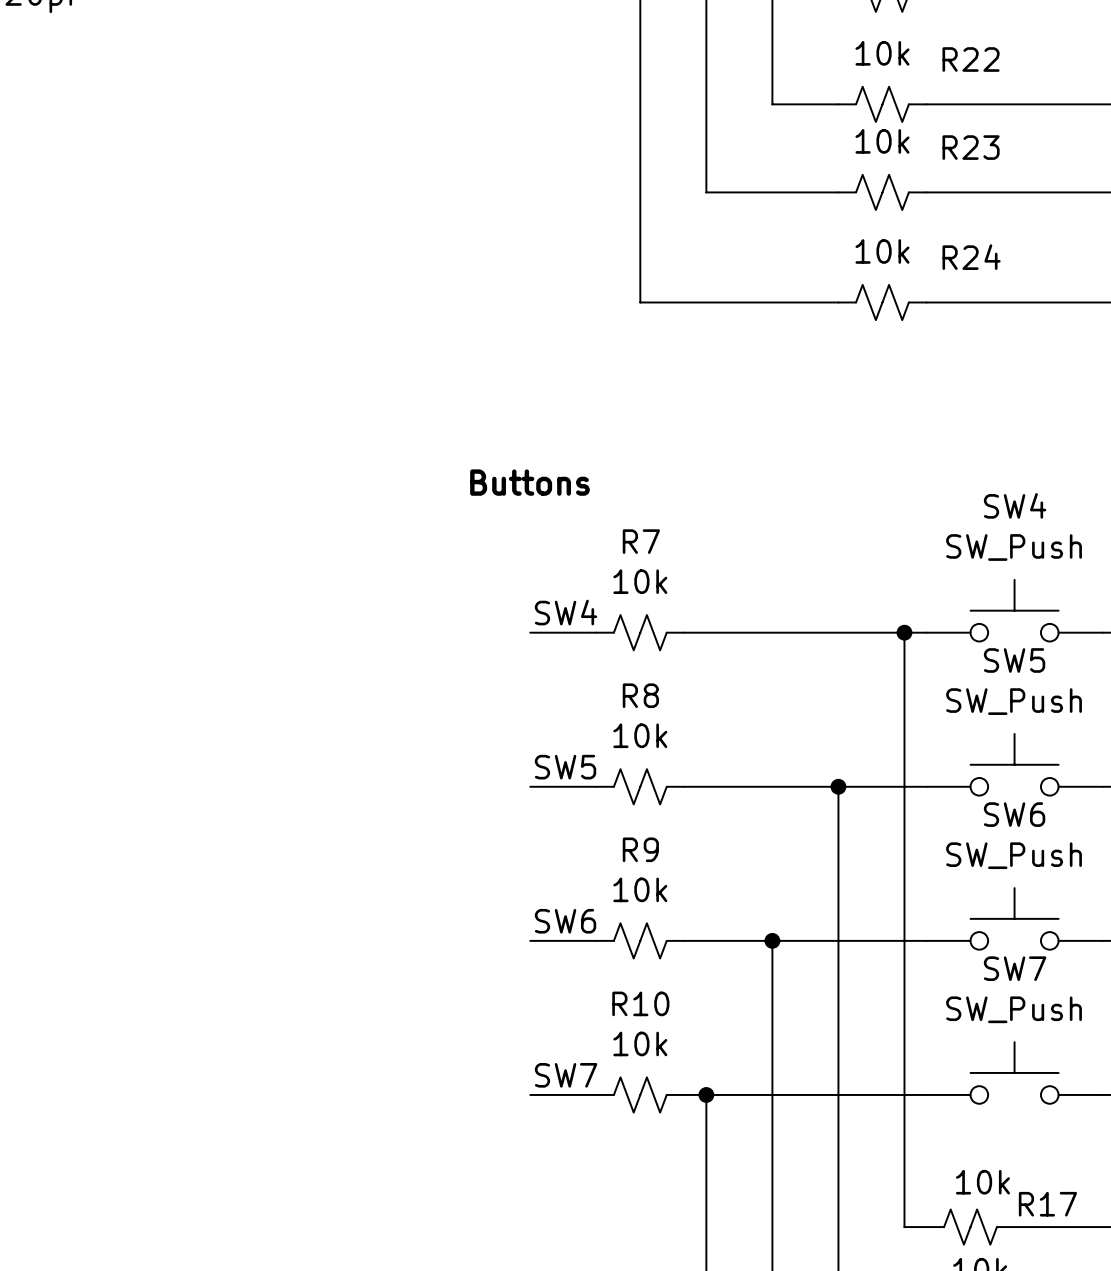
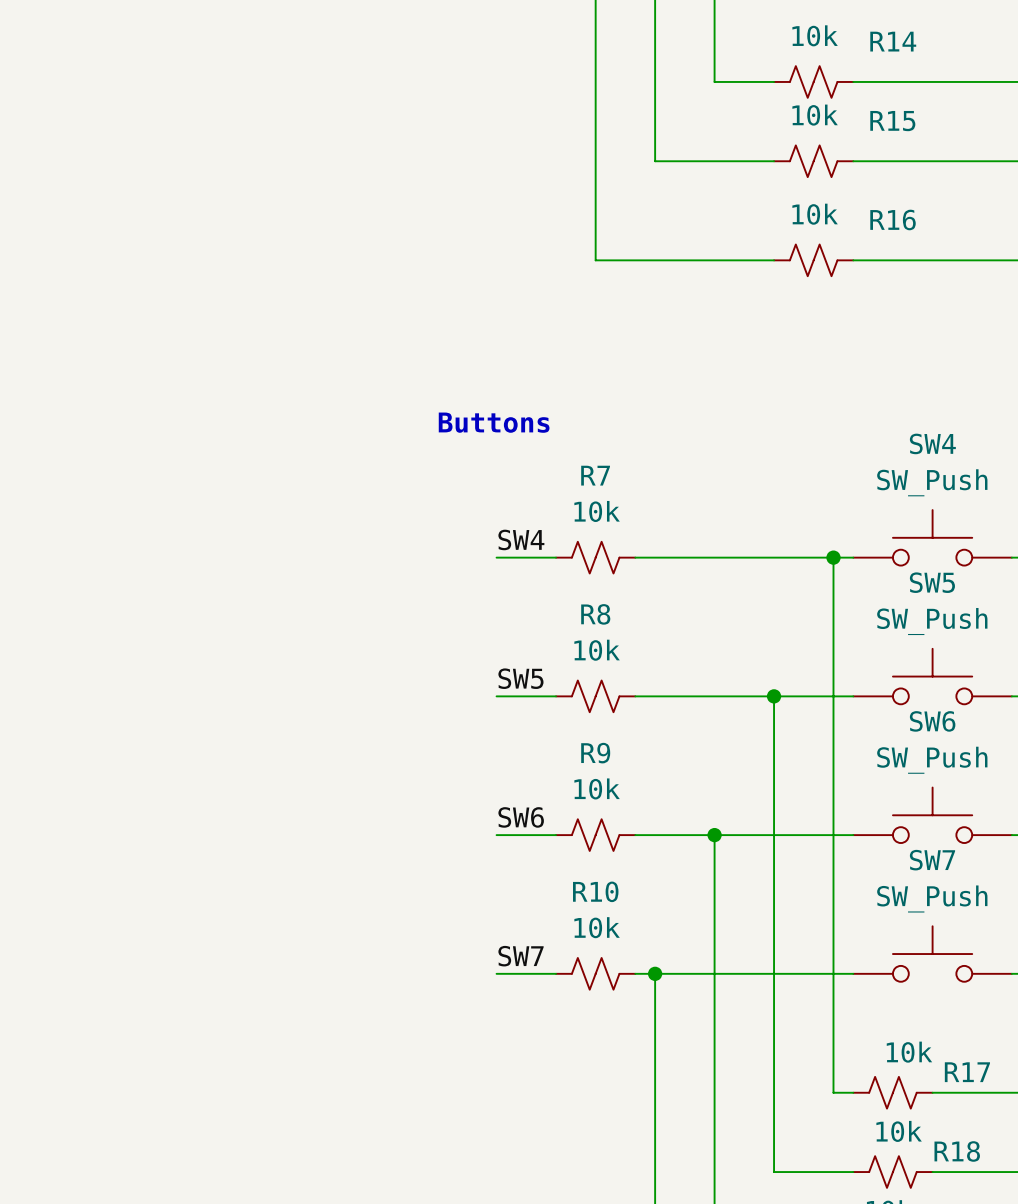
R22 name: R22 (971, 59) -> R14 (893, 41)
R23 name: R23 (971, 147) -> R15 (892, 121)
R24 name: R24 (971, 257) -> R16 (893, 219)

